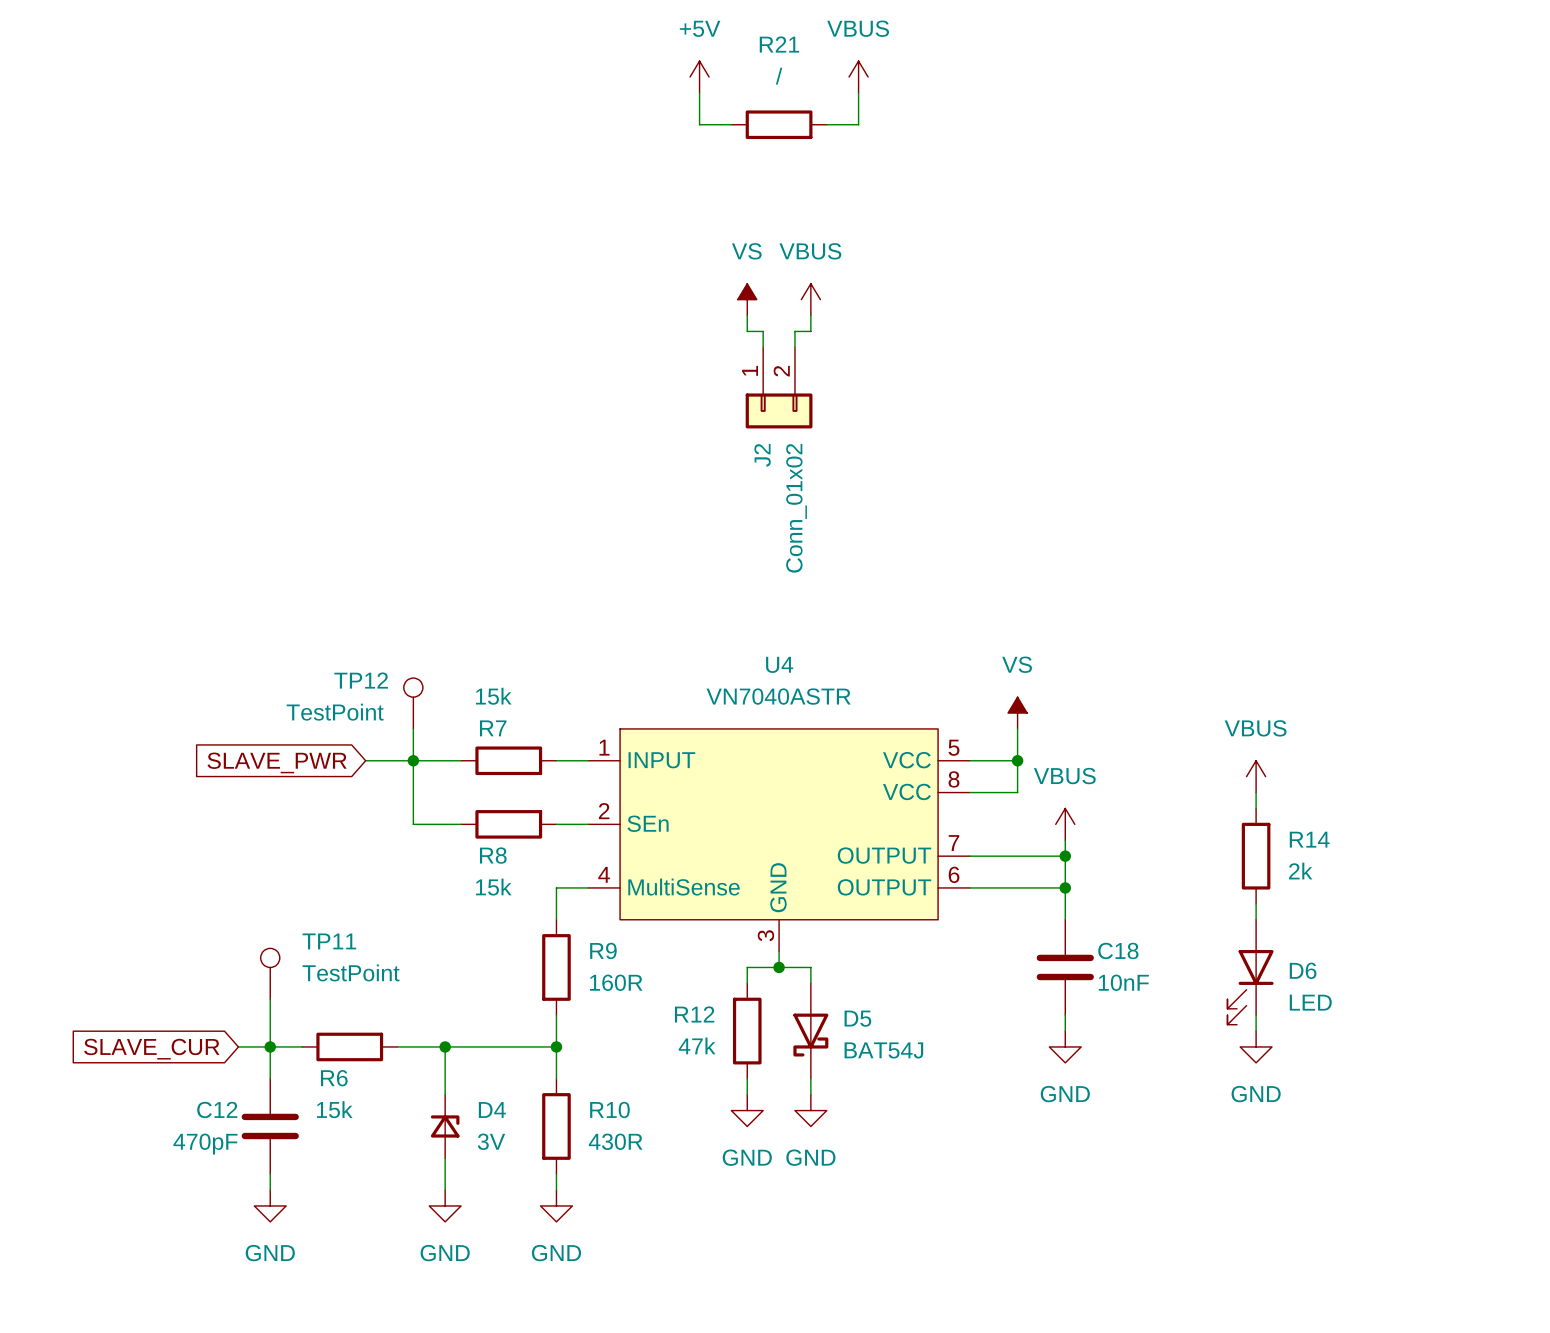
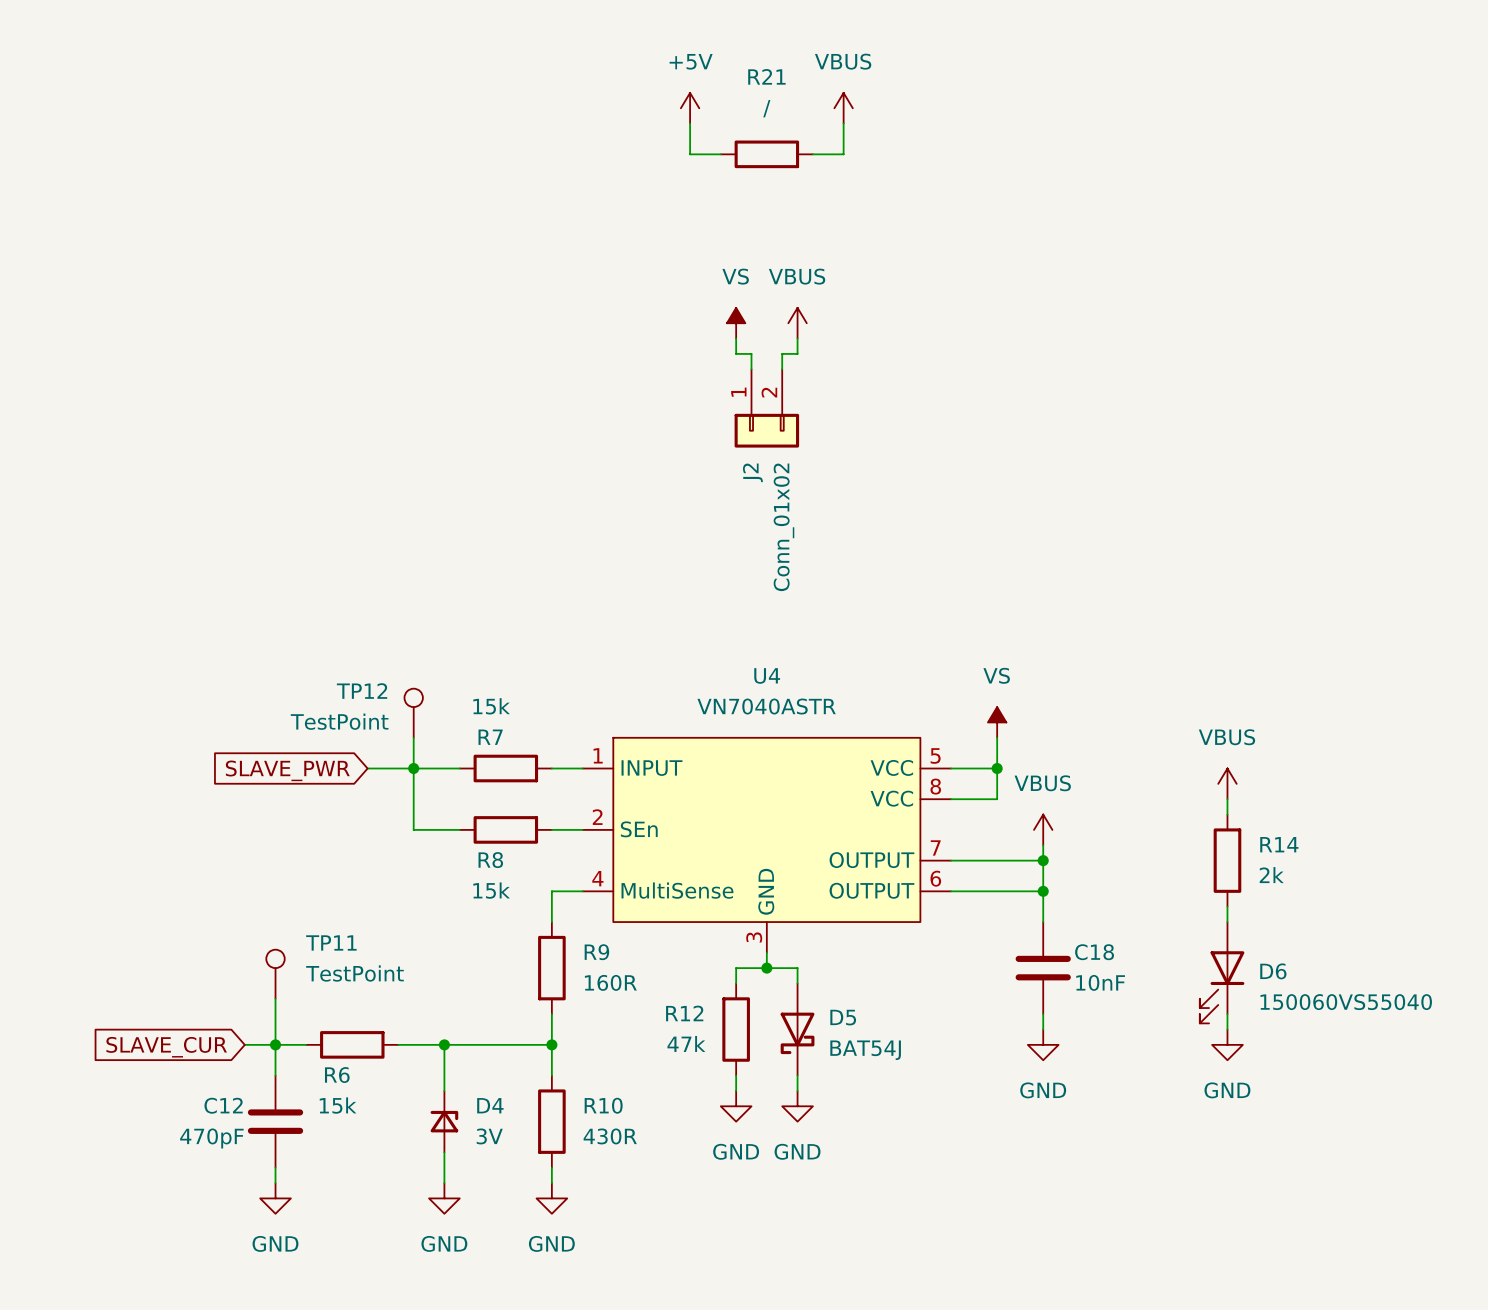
D6 value: LED (1310, 1002) -> 150060VS55040 (1346, 1002)

